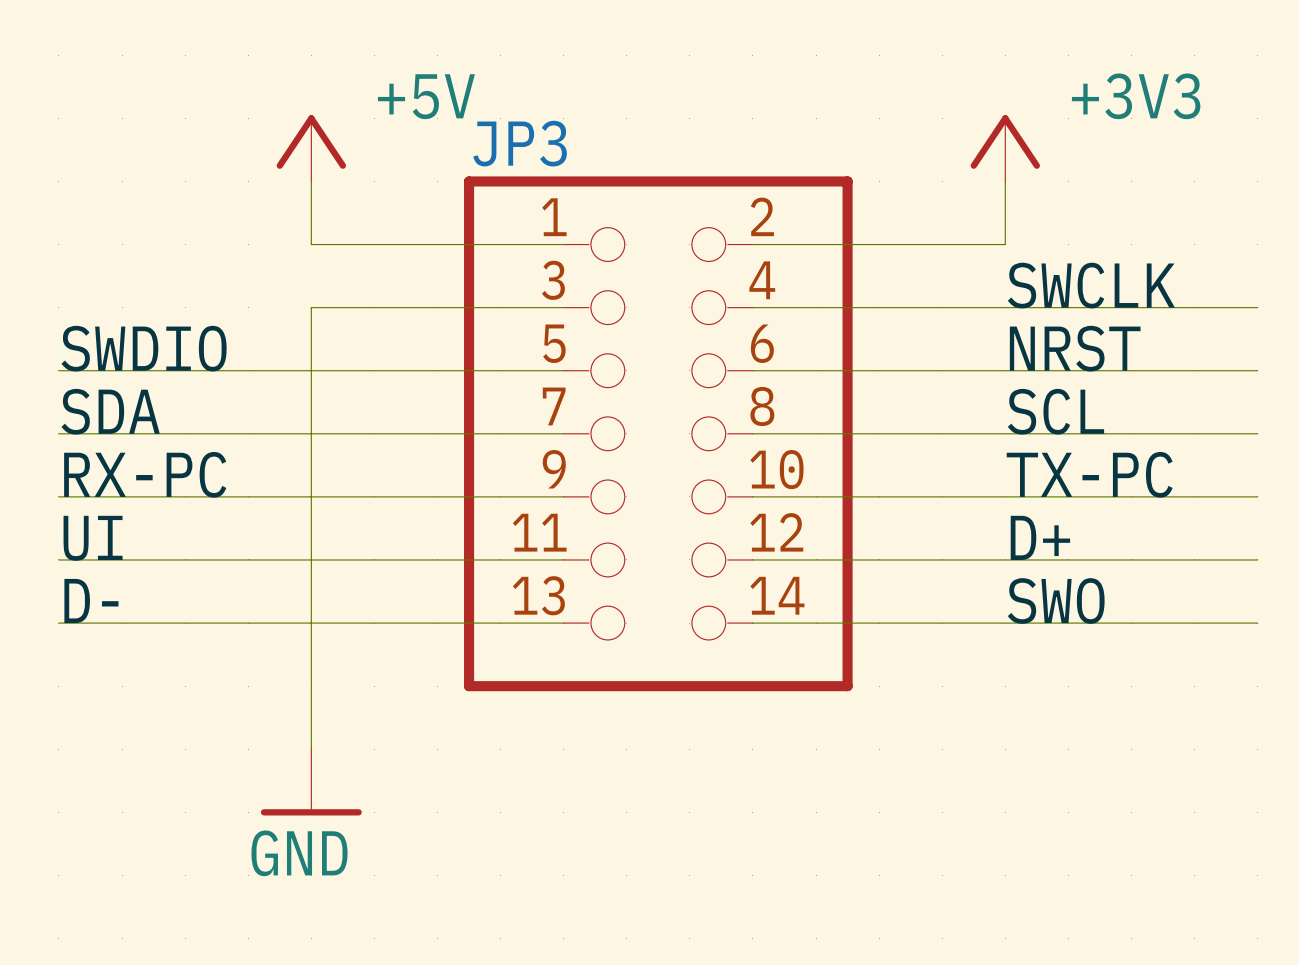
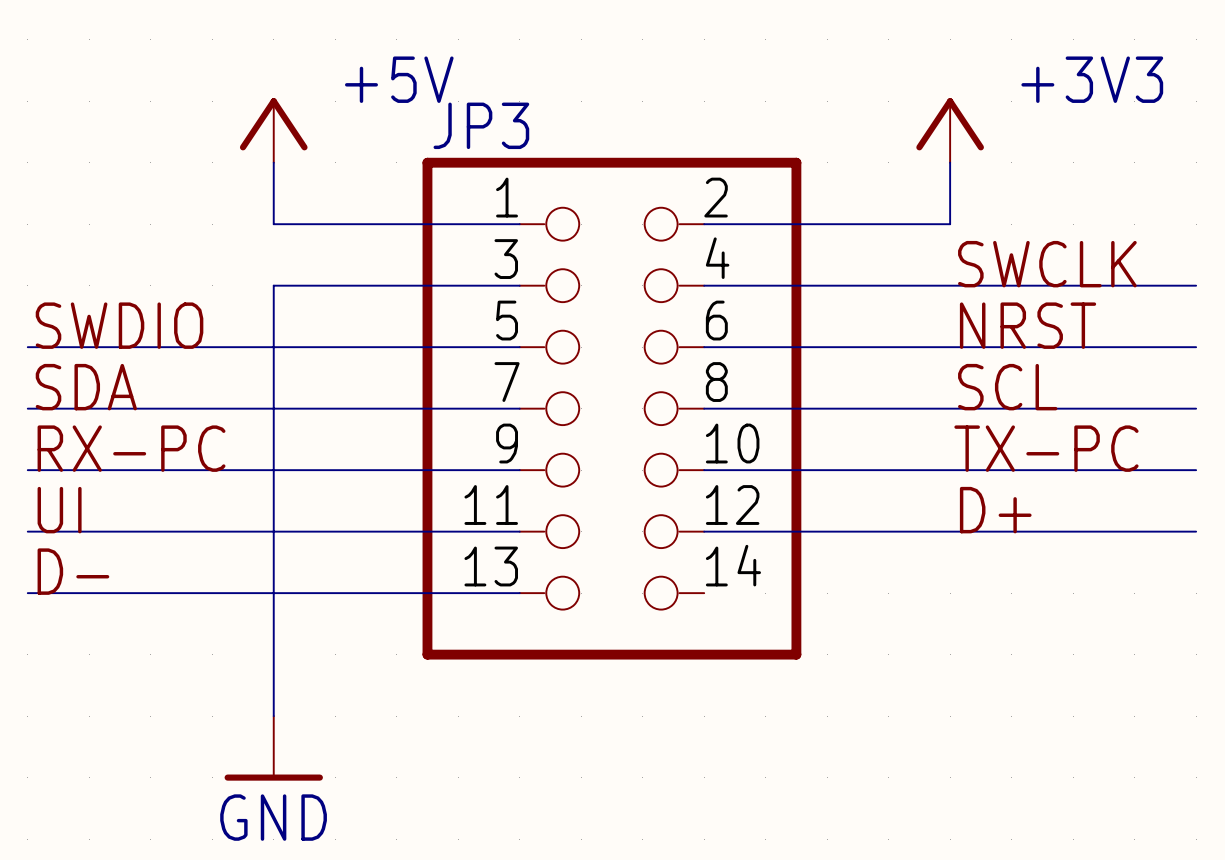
label: SWO (1056, 600) -> none
wire: (752, 623) (1257, 623) -> none

